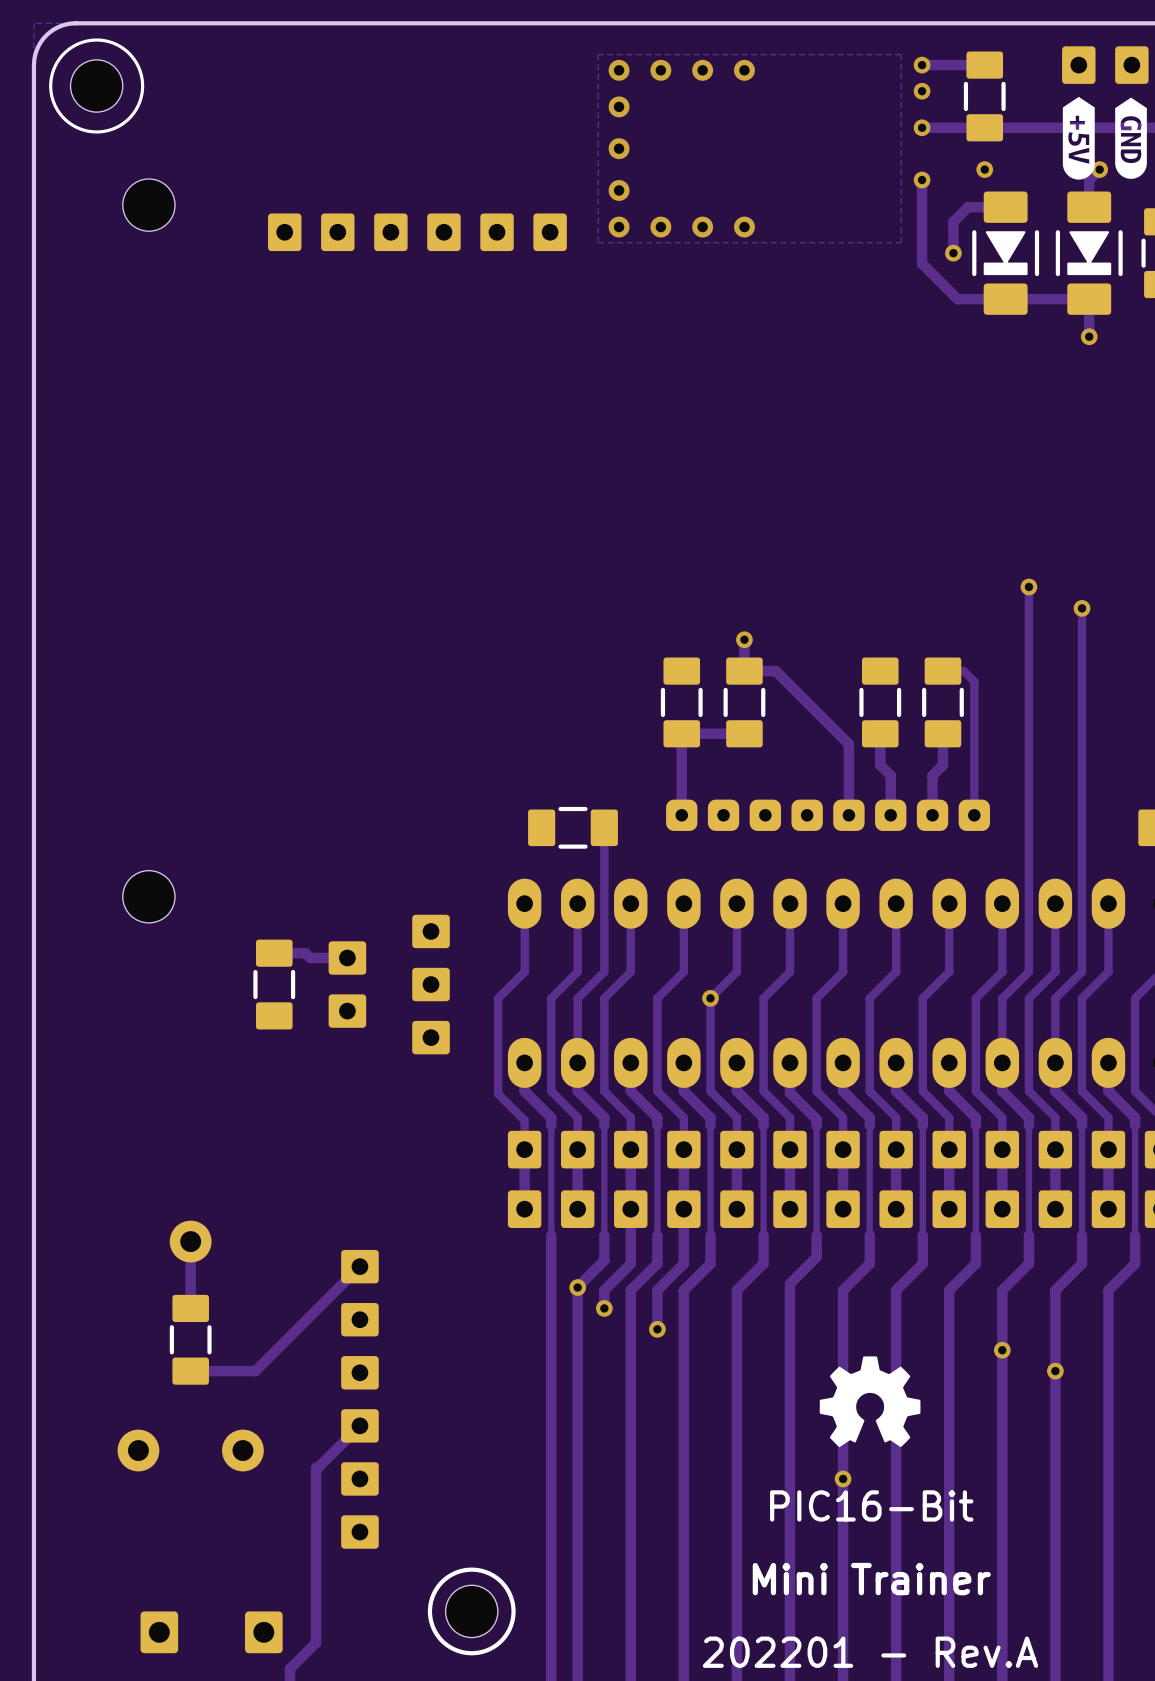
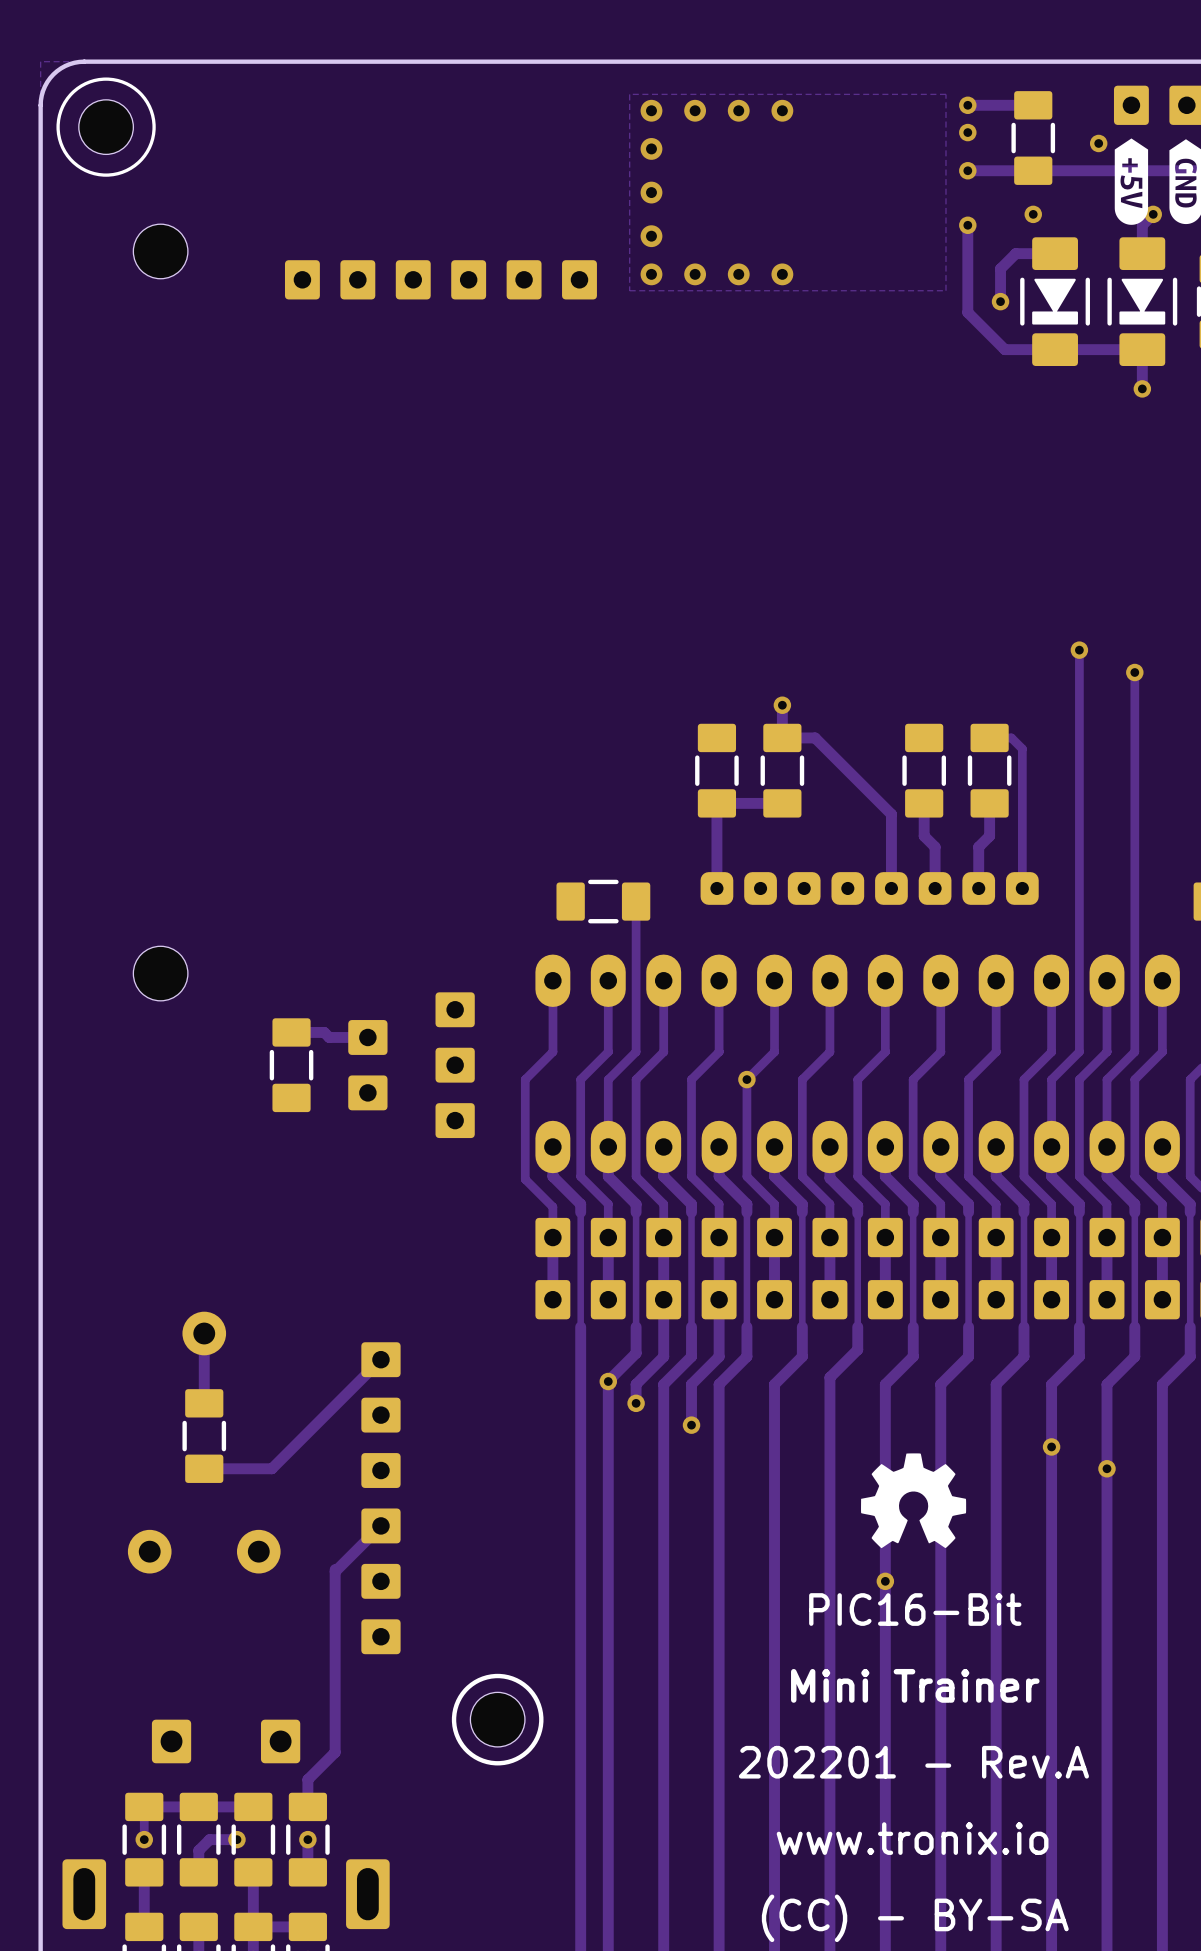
via: none -> (1098, 143)

